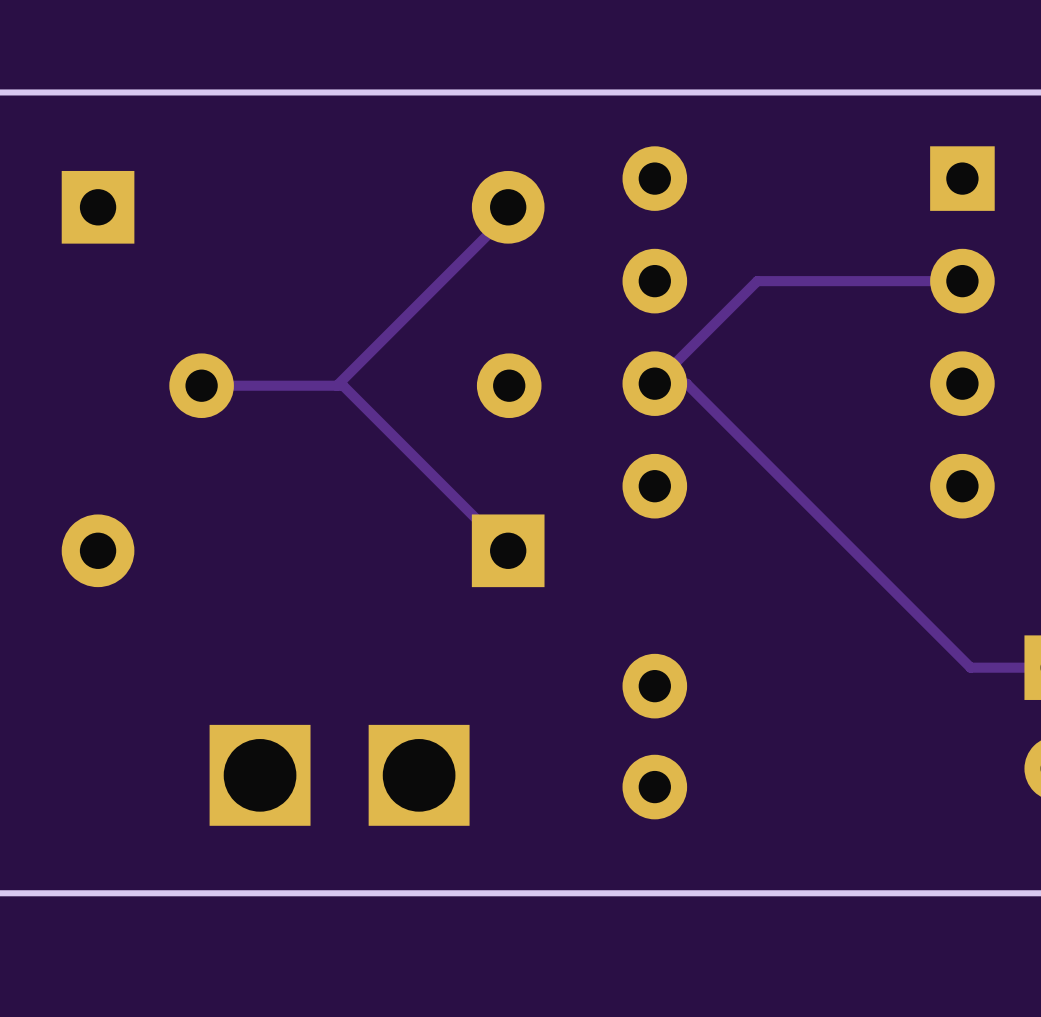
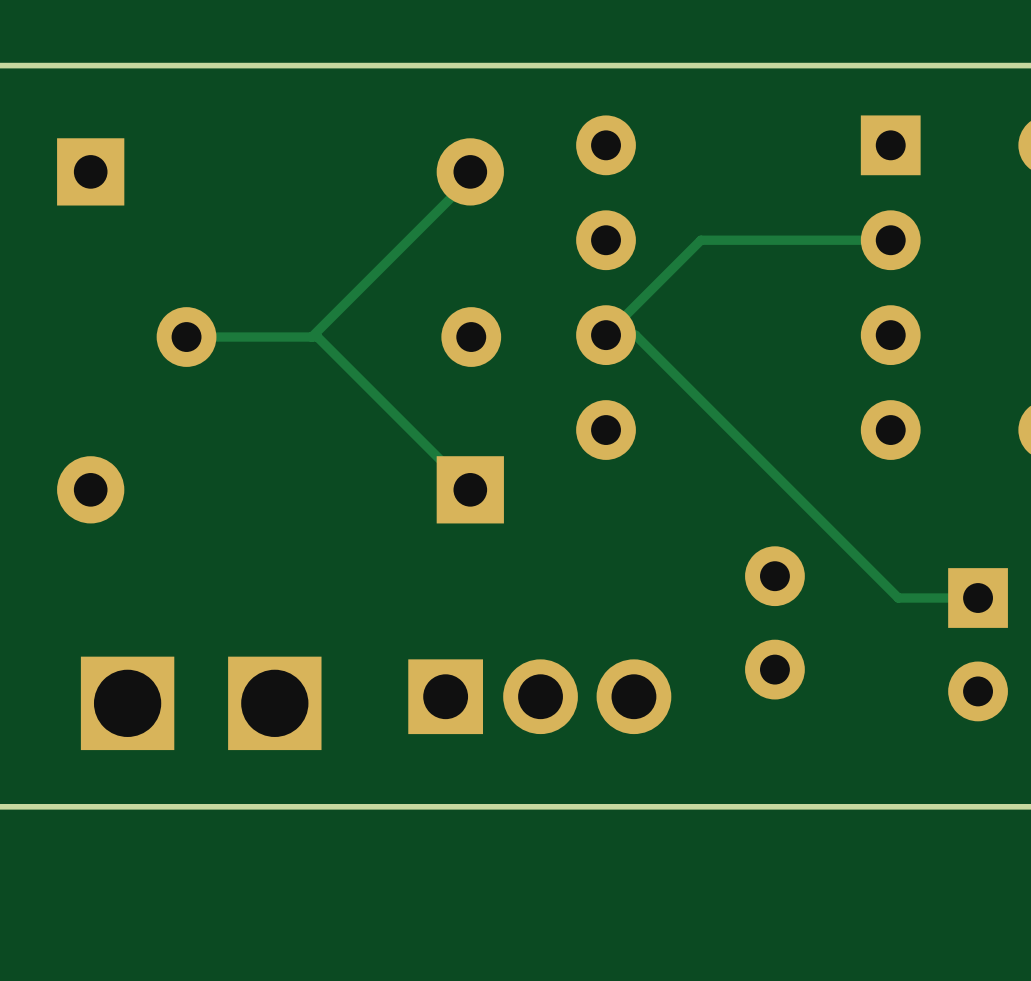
part position: (654, 736) -> (774, 622)
part: none -> (539, 696)
part position: (339, 775) -> (201, 703)

